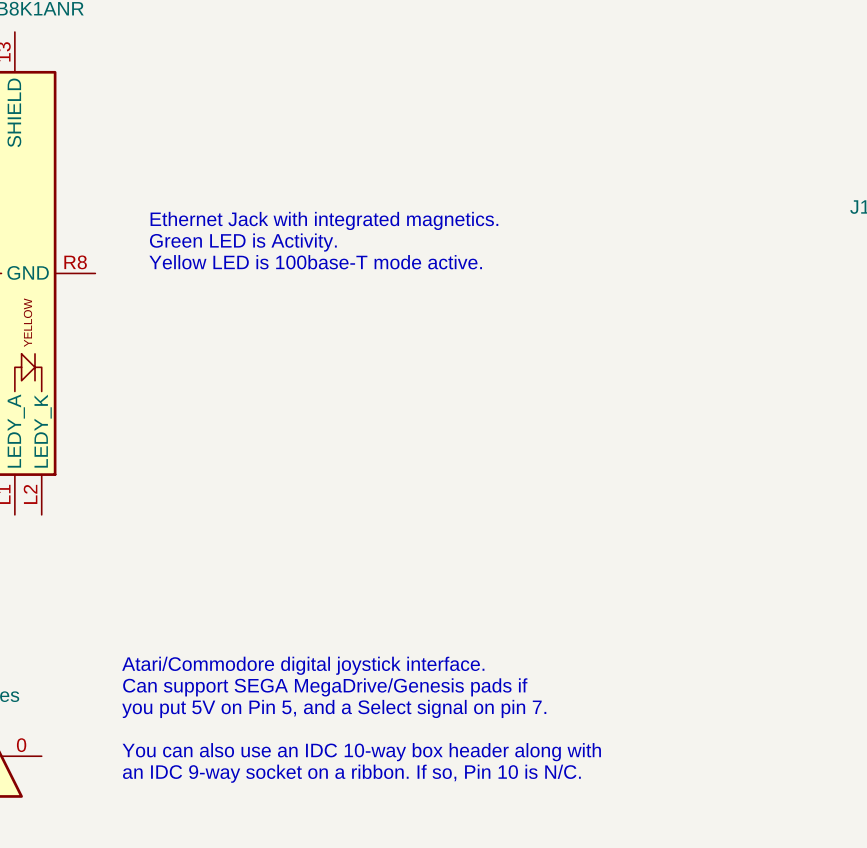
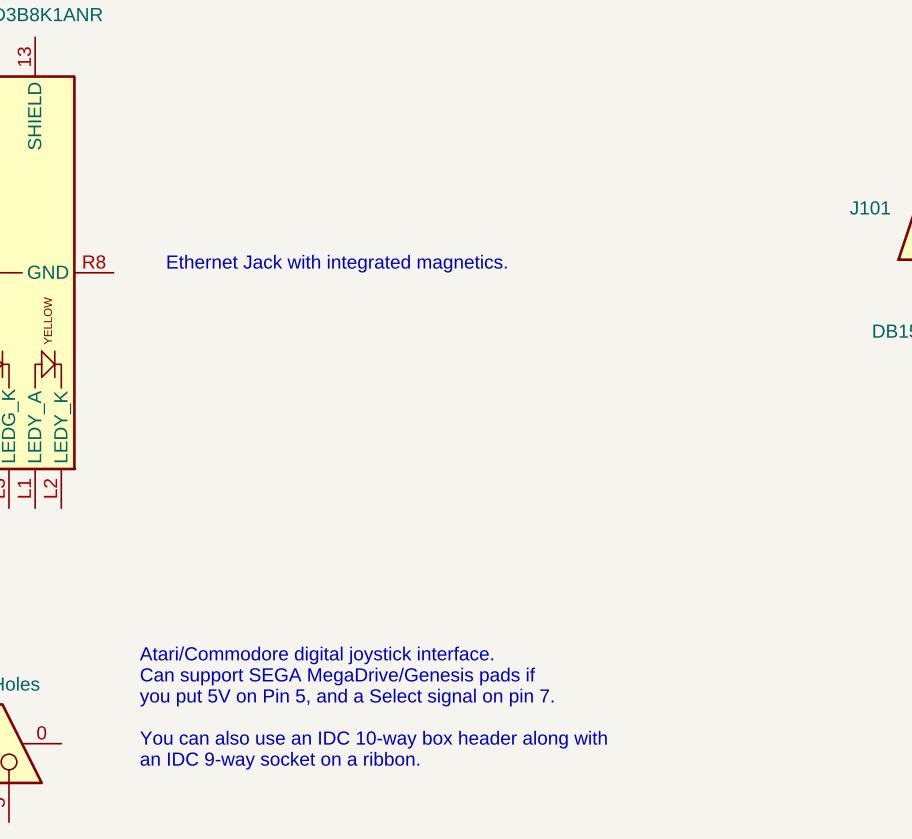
text: Ethernet Jack with integrated magnetics. (324, 220) -> none
text: Green LED is Activity. (243, 242) -> none
text: Yellow LED is 100base-T mode active. (315, 262) -> Ethernet Jack with integrated magnetics. (337, 263)
text: an IDC 9-way socket on a ribbon. If so, Pin 10 is N/C. (351, 773) -> an IDC 9-way socket on a ribbon. (279, 760)

